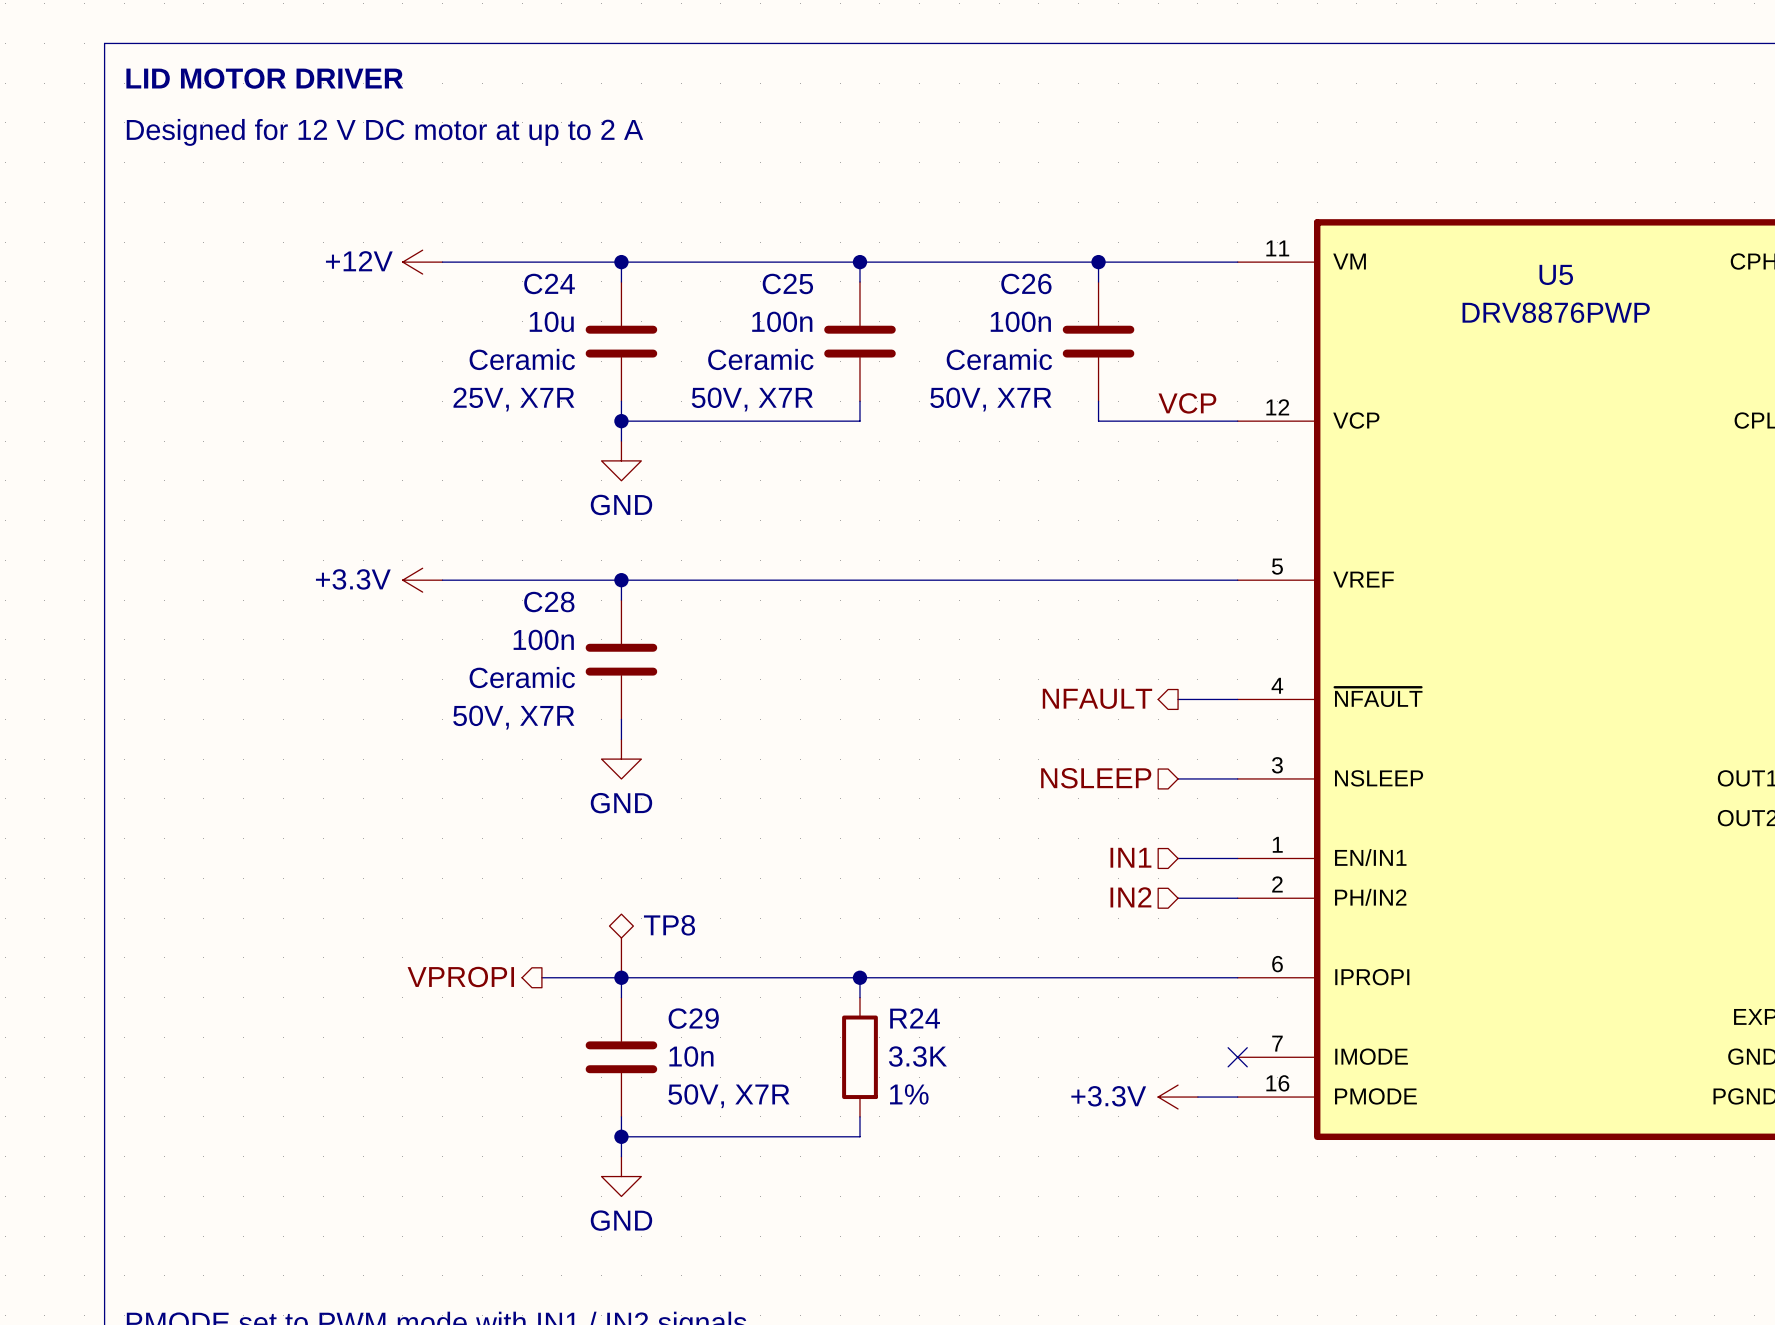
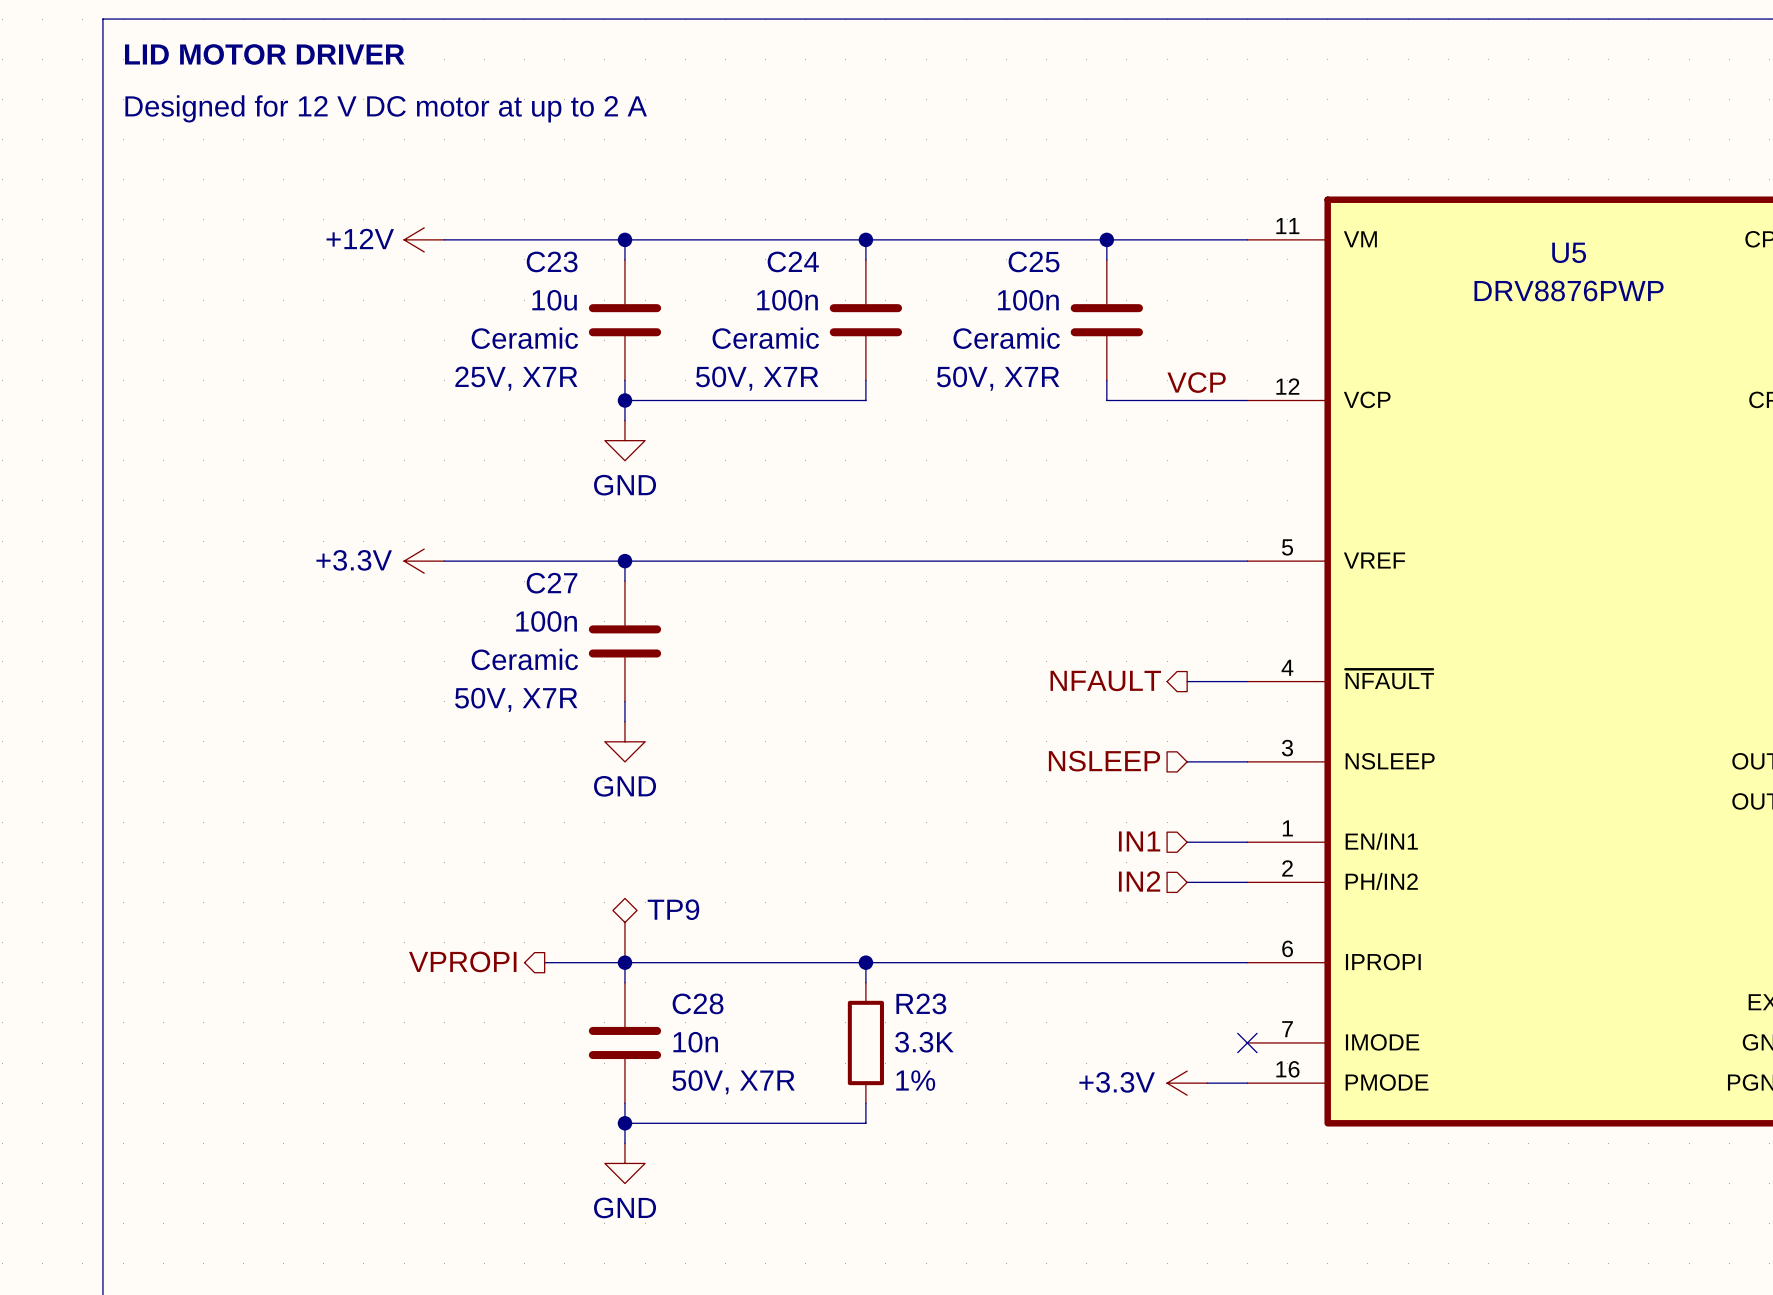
C24 name: C24 (549, 283) -> C23 (552, 261)
C25 name: C25 (787, 283) -> C24 (793, 261)
C26 name: C26 (1026, 283) -> C25 (1034, 261)
C28 name: C28 (549, 602) -> C27 (552, 583)
TP8 name: TP8 (669, 925) -> TP9 (673, 909)
C29 name: C29 (693, 1018) -> C28 (698, 1003)
R24 name: R24 (915, 1018) -> R23 (921, 1003)

